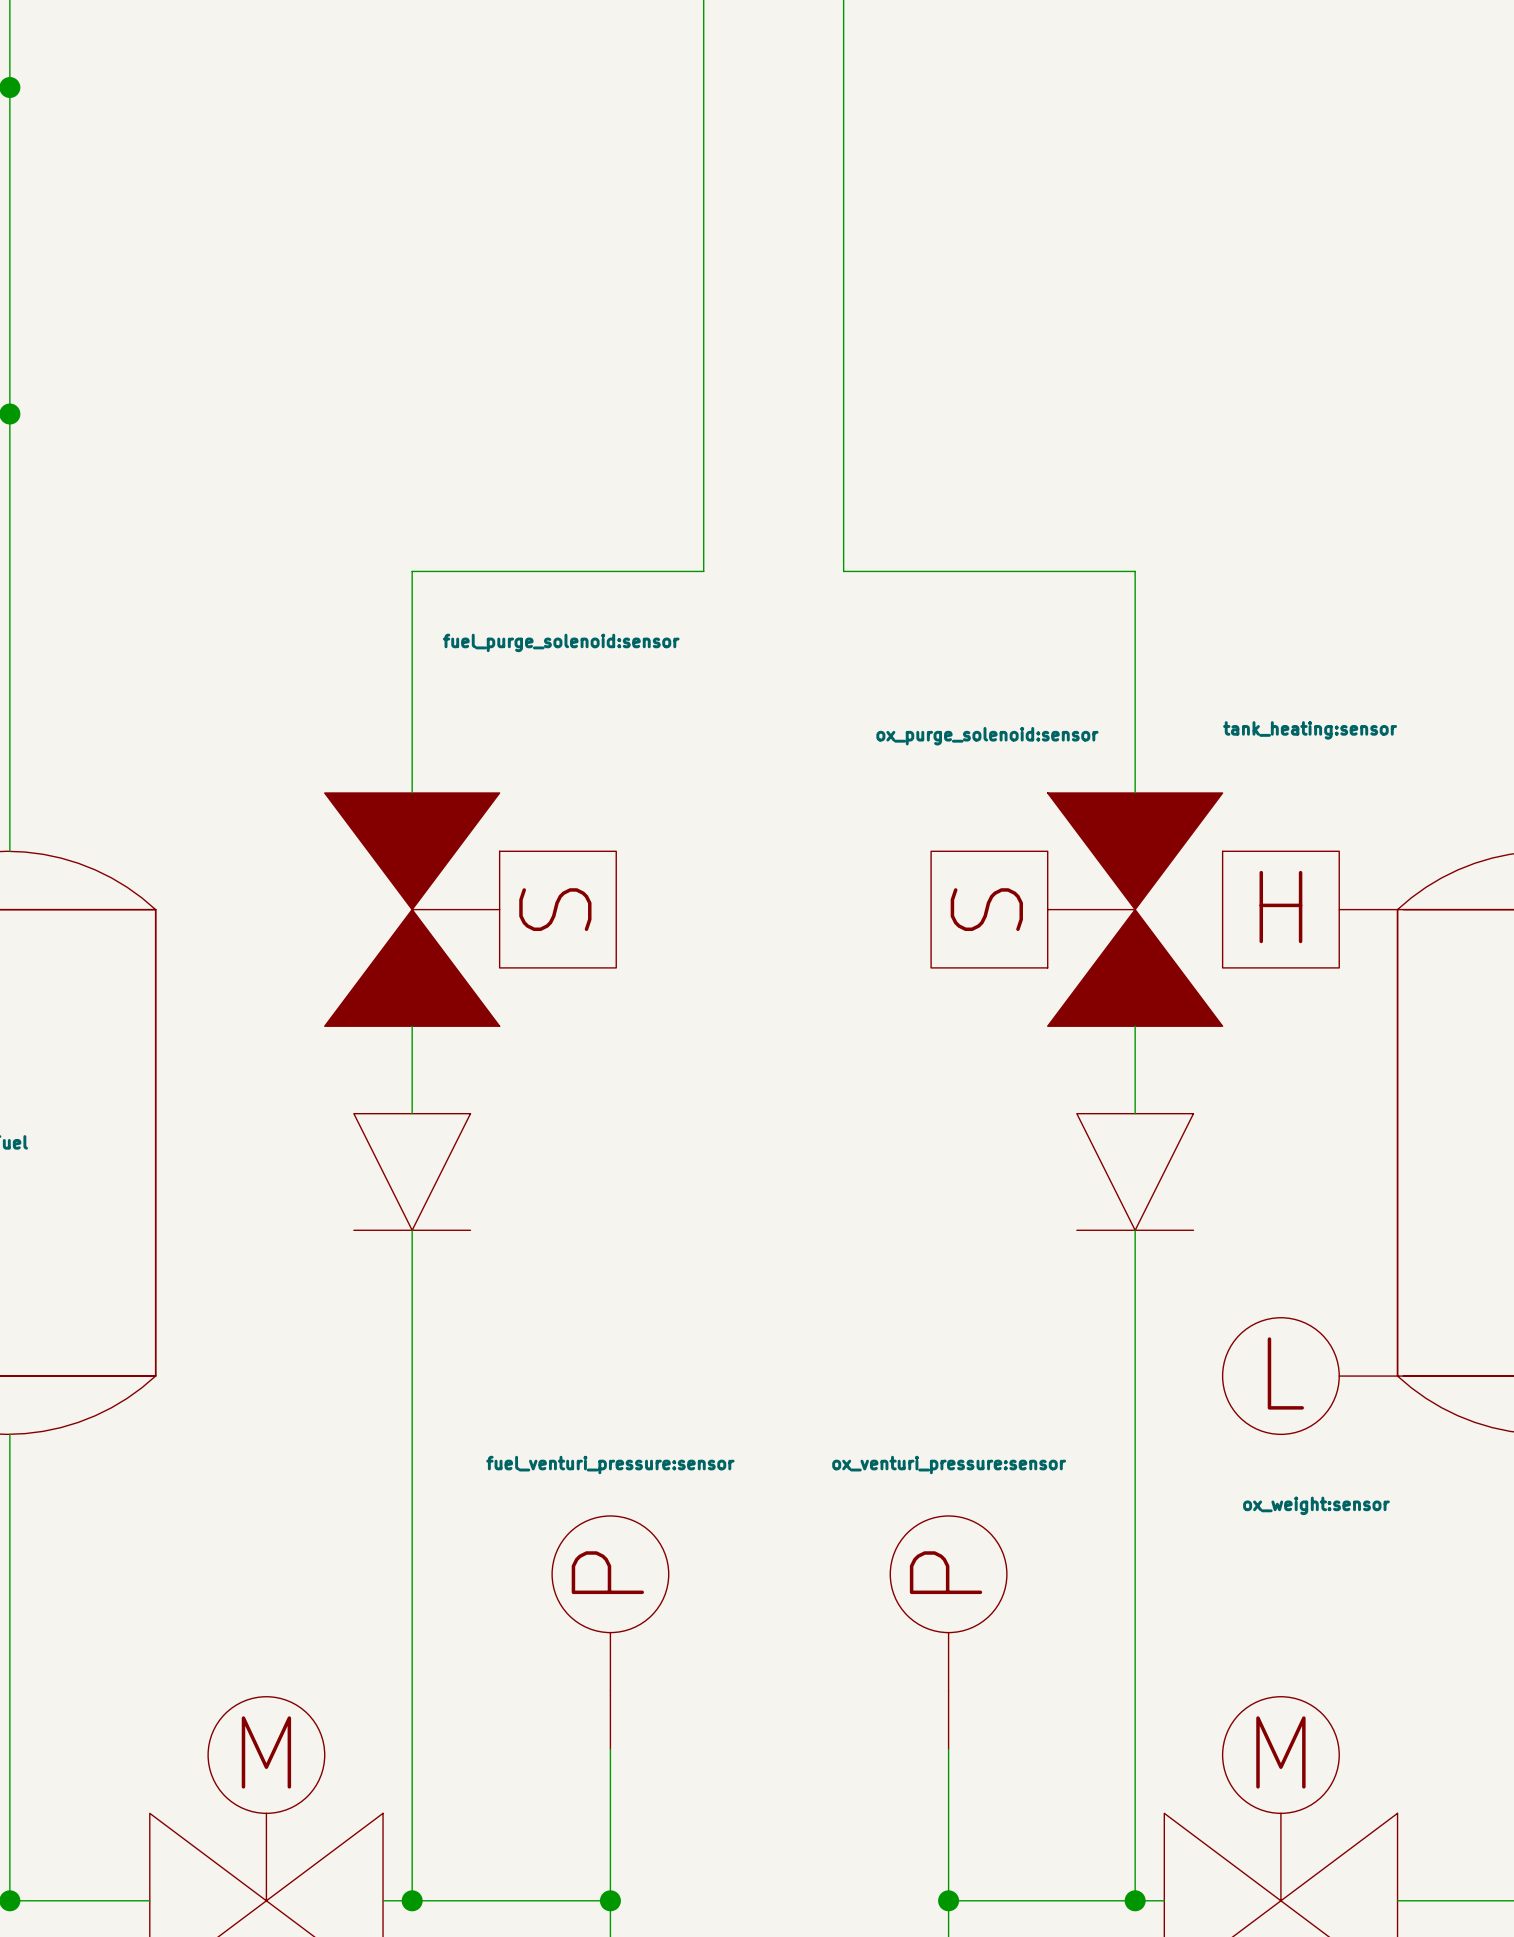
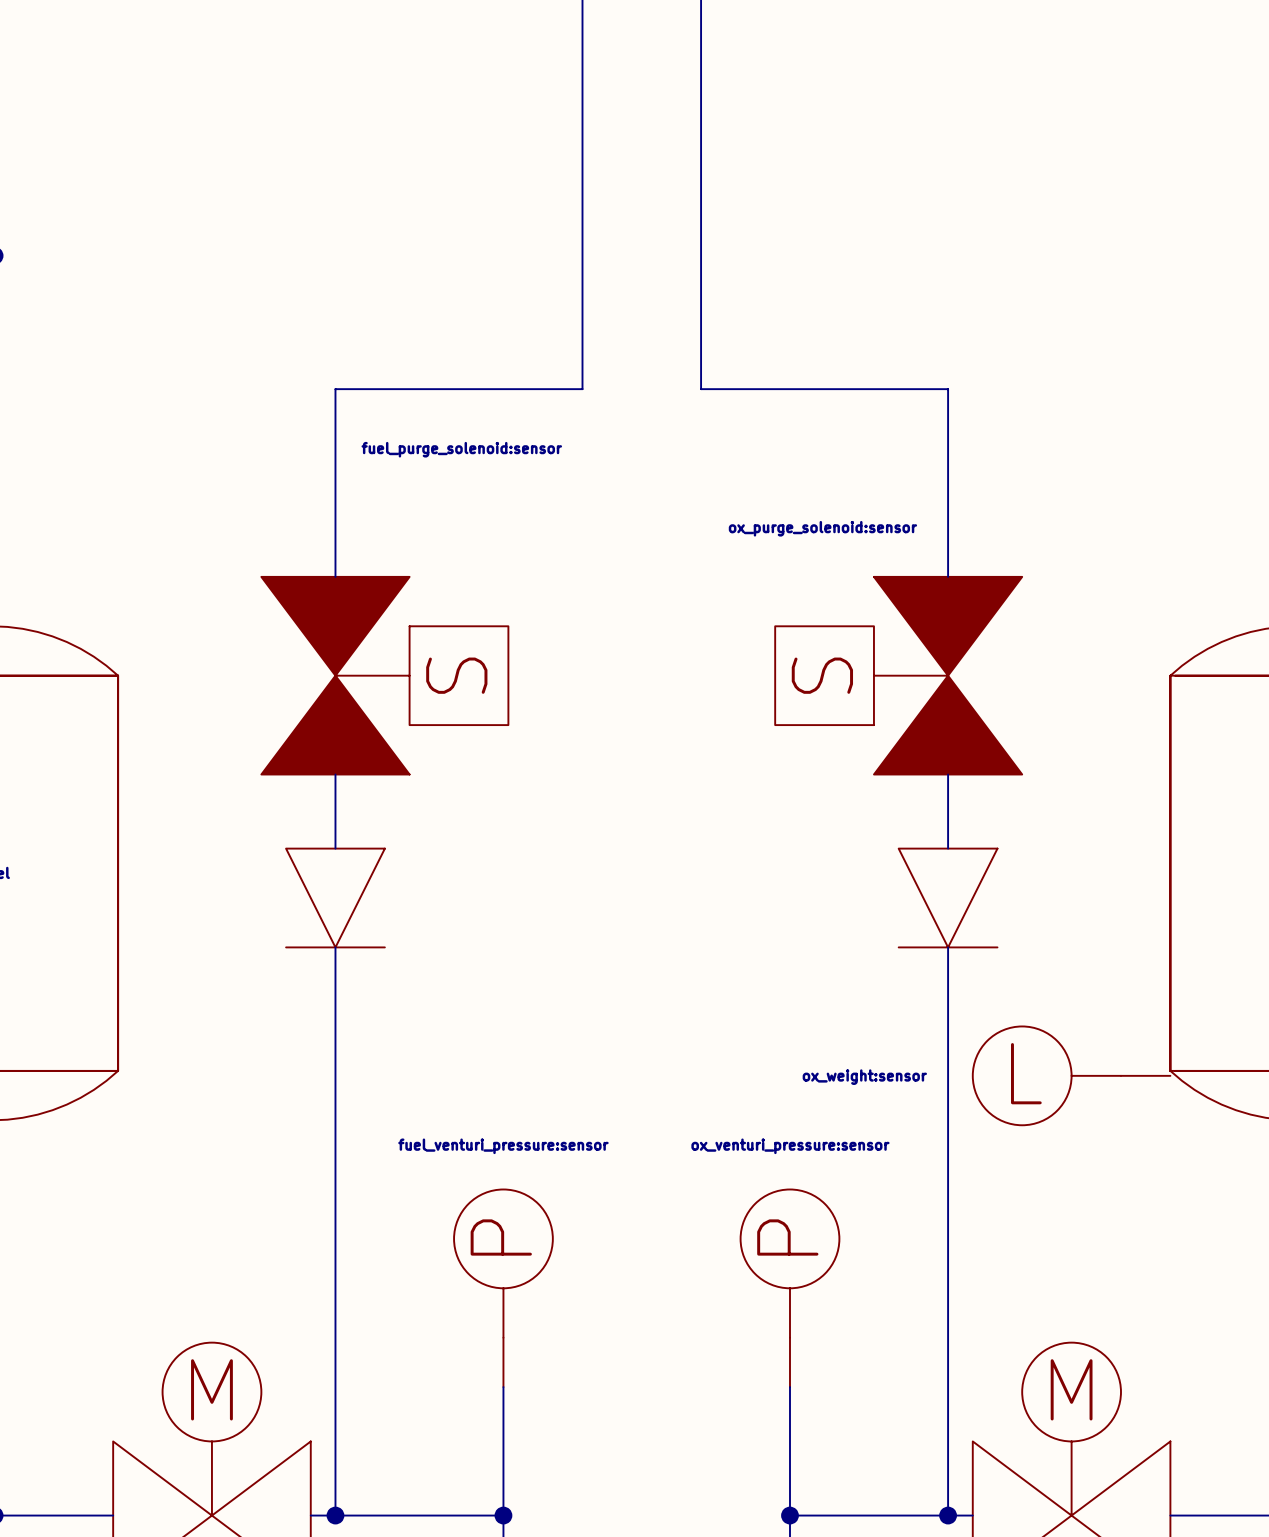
part: tank_heating:sensor (1310, 909) -> none
part: ox_weight:sensor (1310, 1376) -> none
part: none -> ox_weight:sensor (1071, 1075)

